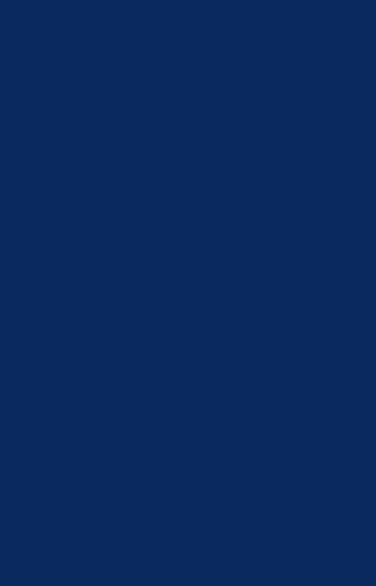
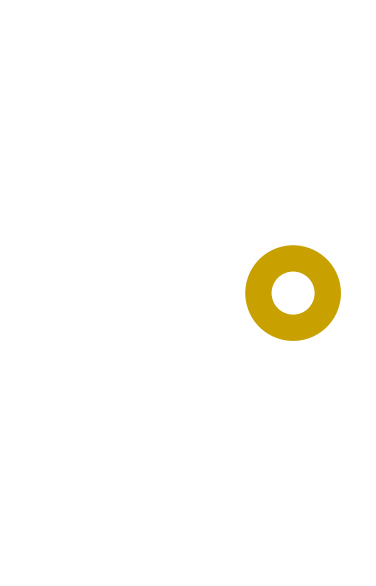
part: none -> (293, 293)

